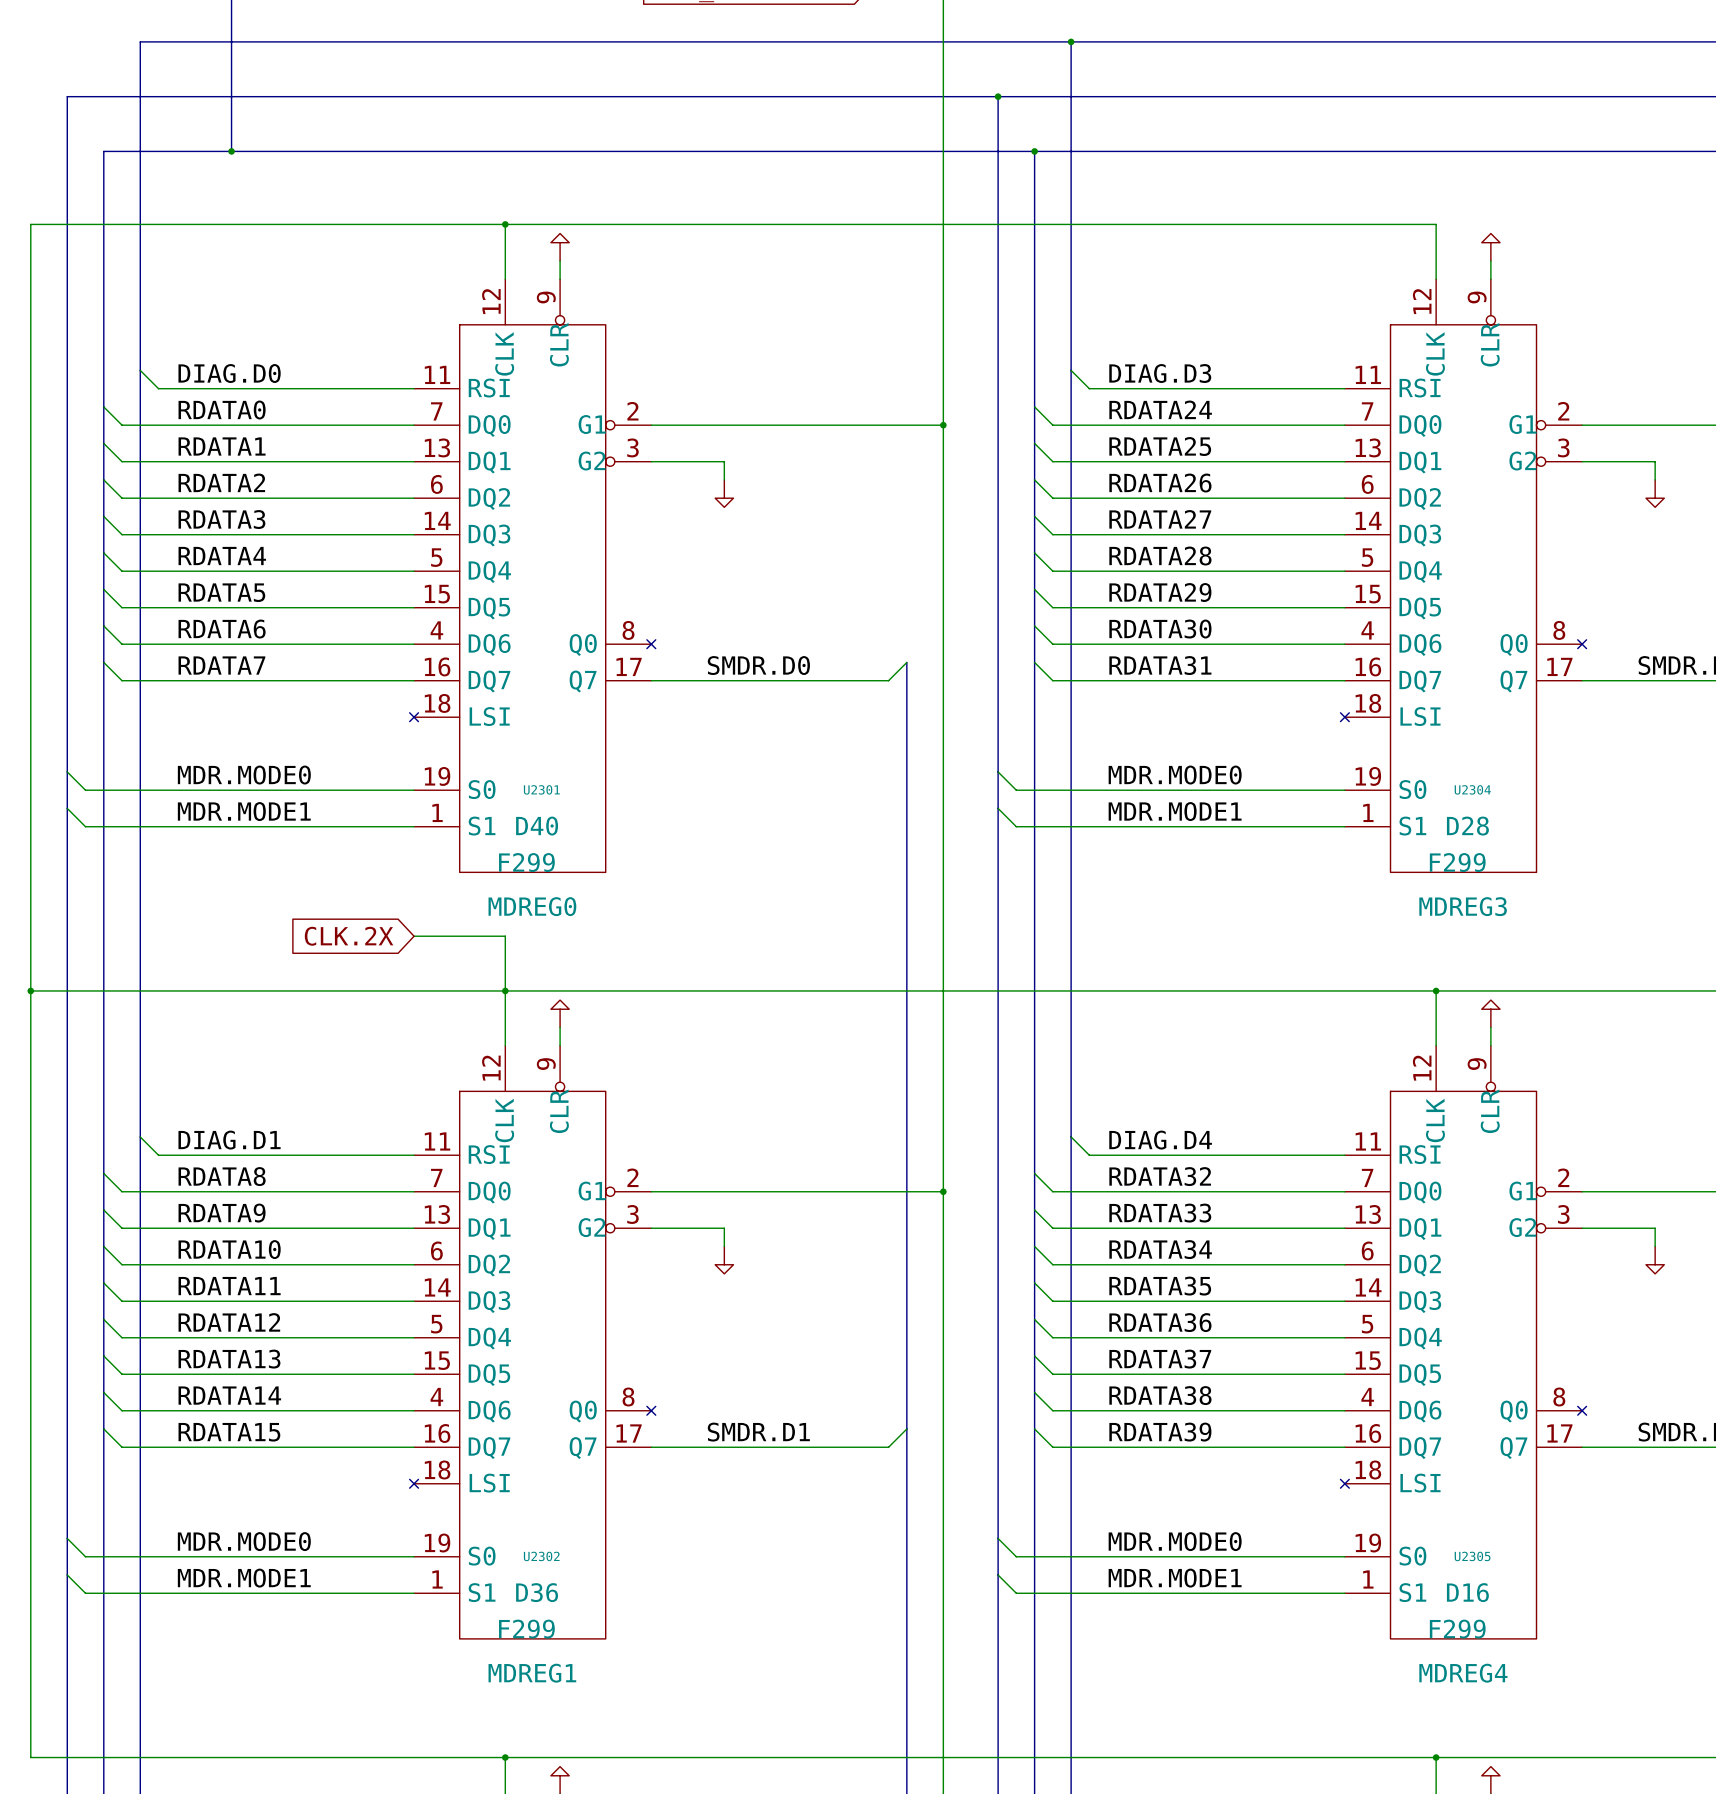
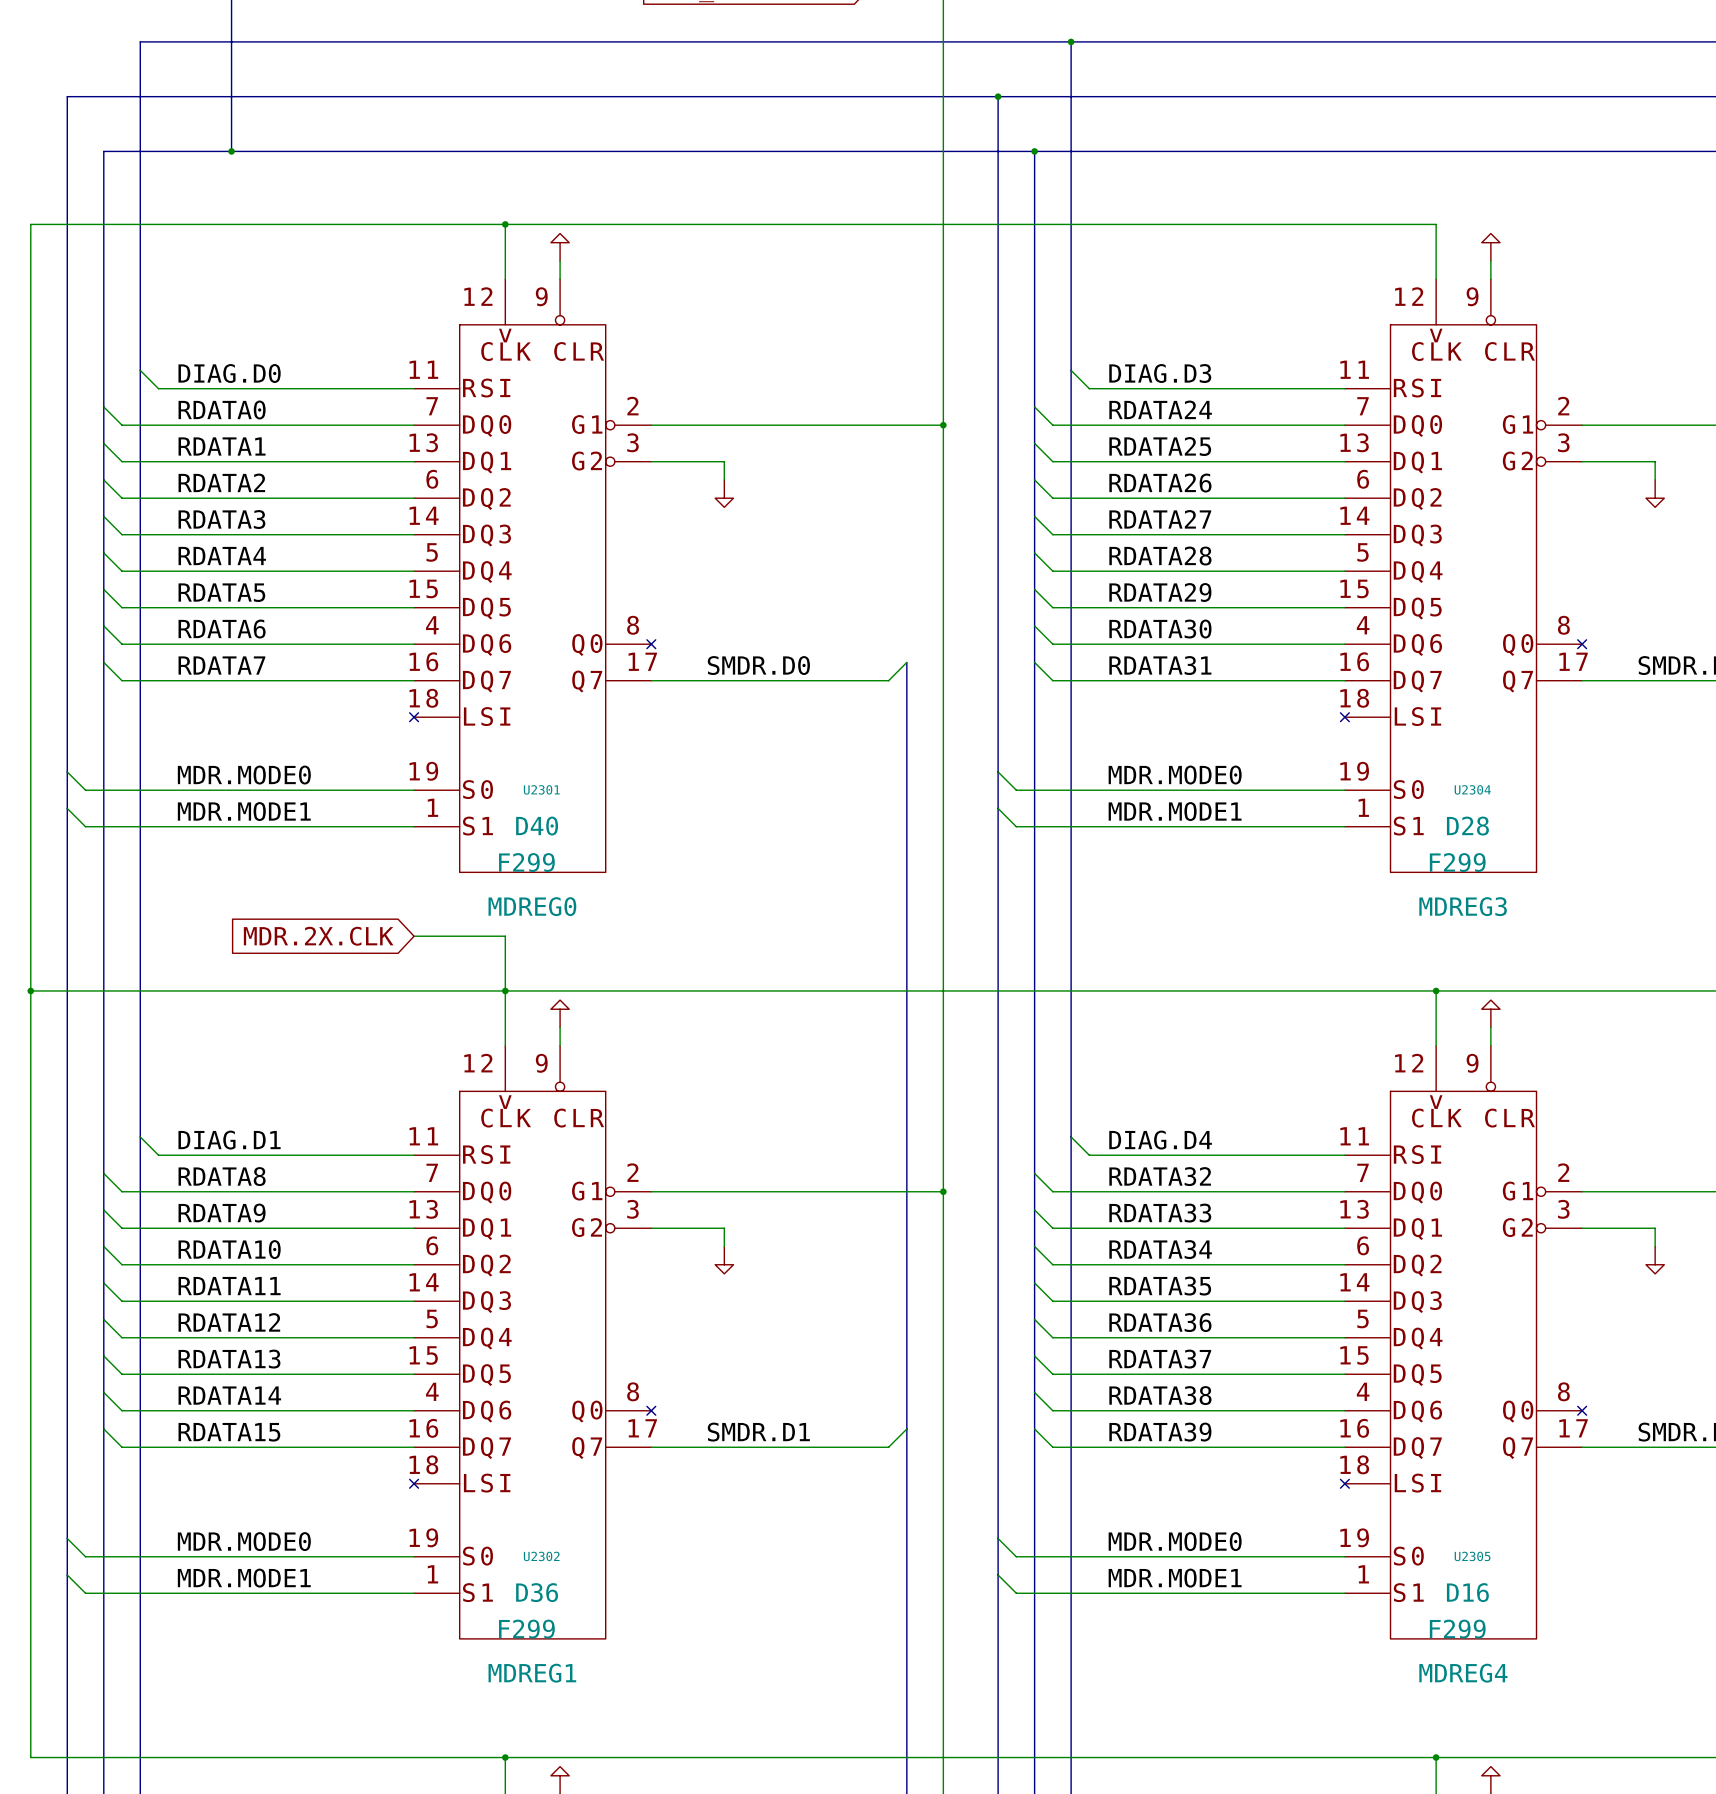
U2301 symbol: [414, 279, 652, 873] -> [414, 279, 652, 873]
U2304 symbol: [1344, 279, 1583, 873] -> [1344, 279, 1583, 873]
global label: CLK.2X (349, 936) -> MDR.2X.CLK (318, 936)
U2302 symbol: [414, 1045, 652, 1639] -> [414, 1045, 652, 1639]
U2305 symbol: [1344, 1045, 1583, 1639] -> [1344, 1045, 1583, 1639]

